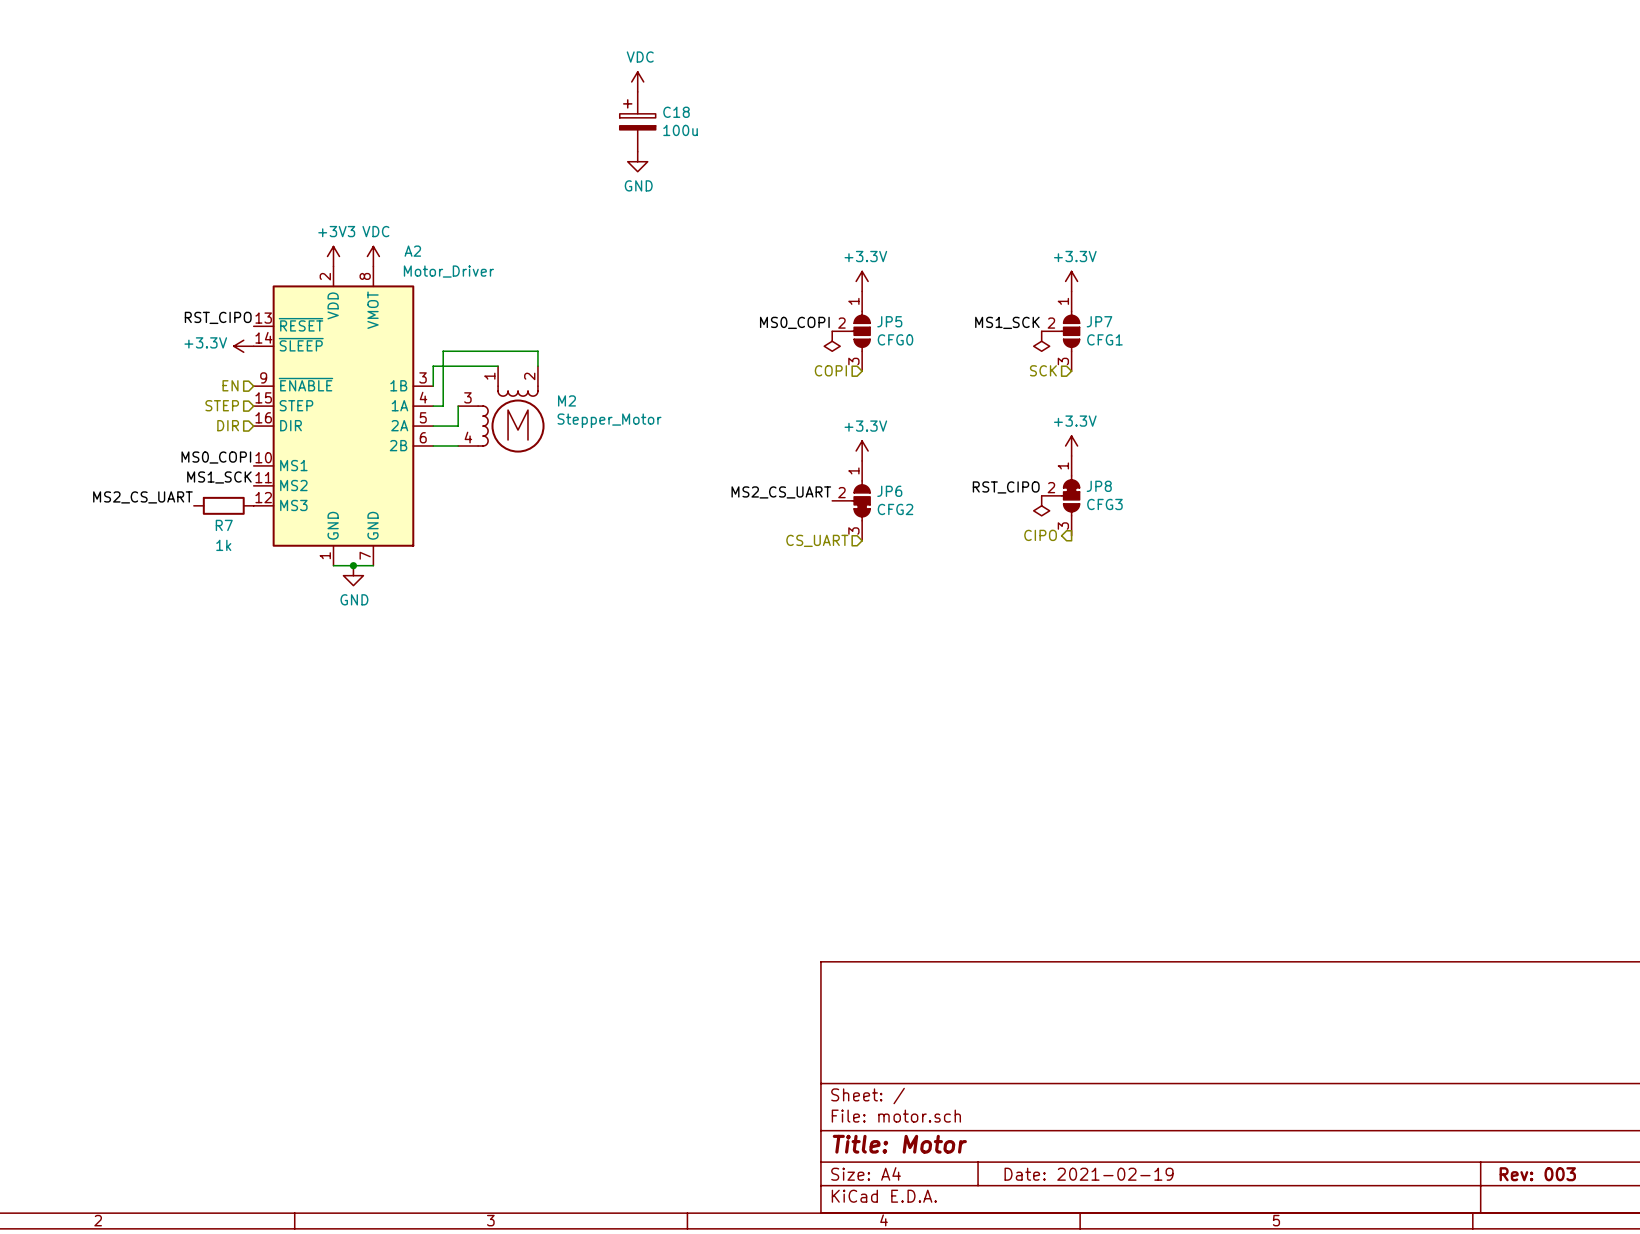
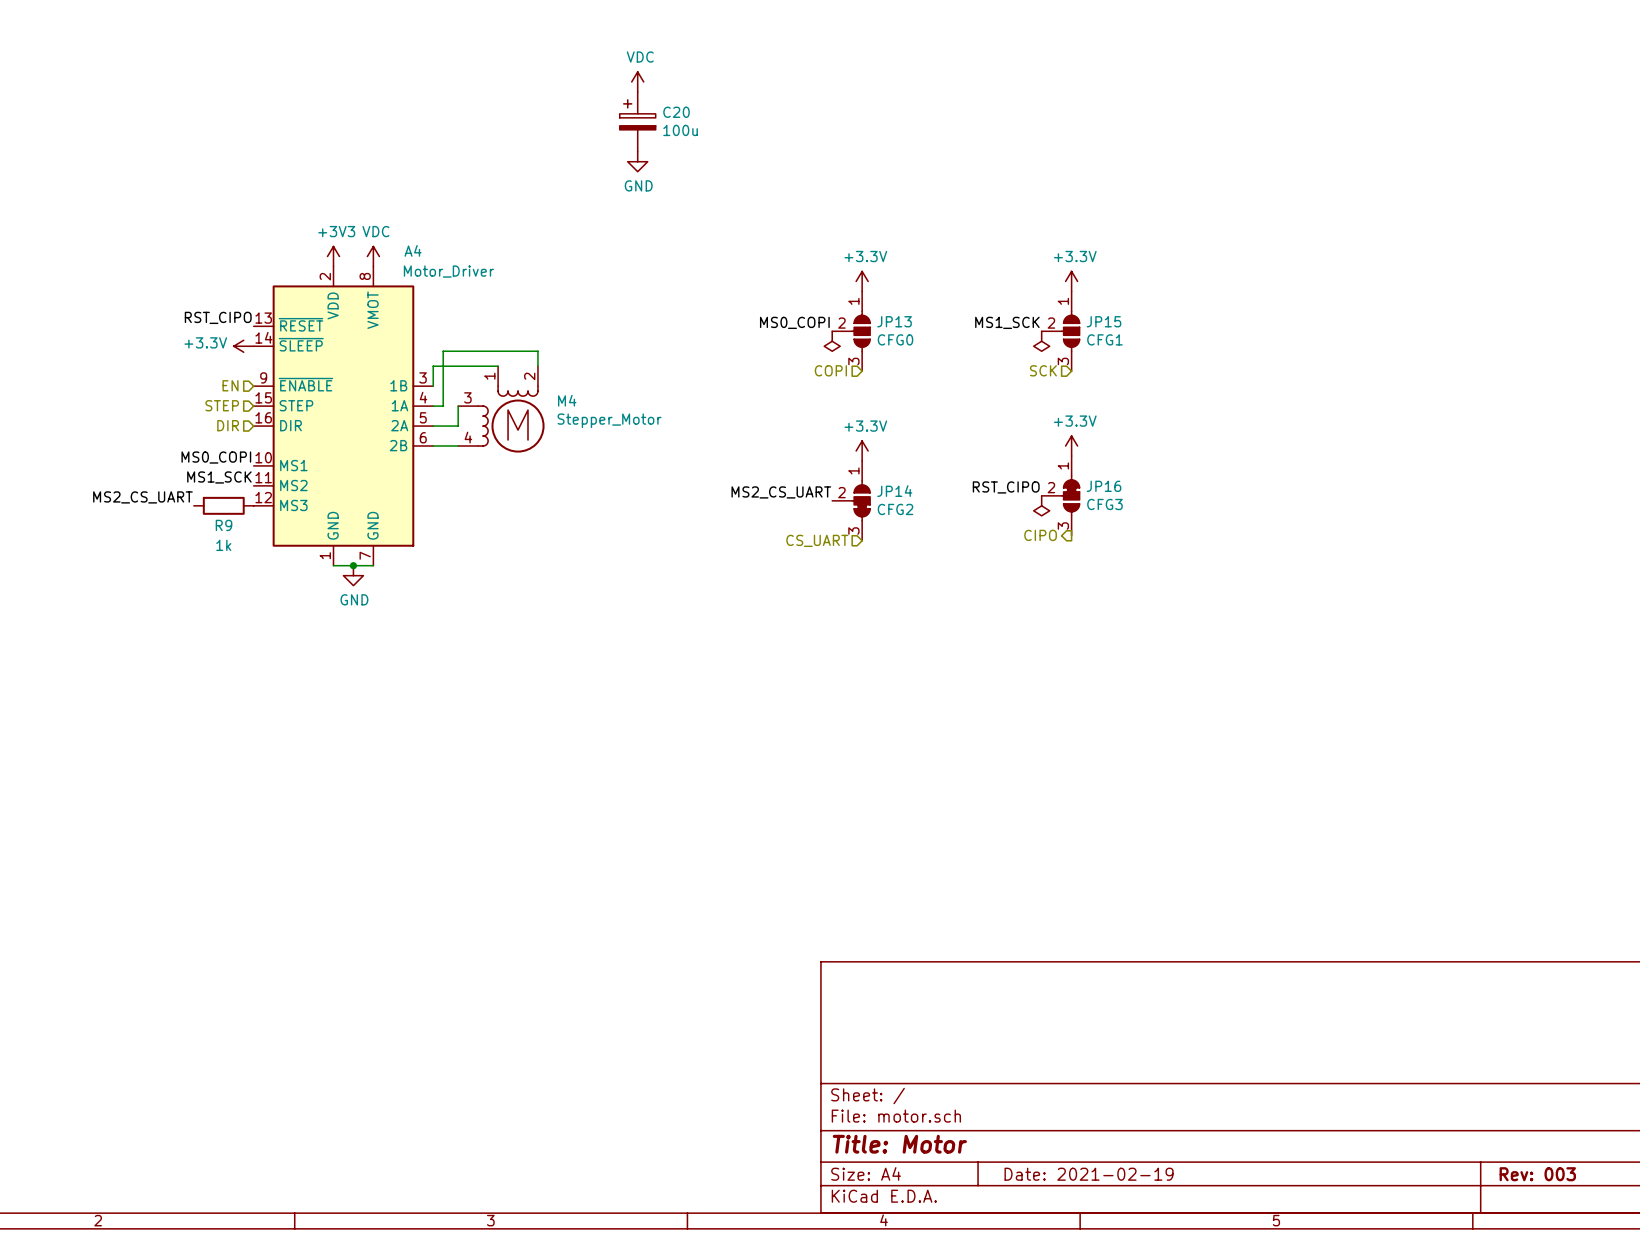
C18 name: C18 (676, 112) -> C20 (676, 112)
A2 name: A2 (412, 251) -> A4 (413, 250)
JP5 name: JP5 (889, 321) -> JP13 (894, 321)
JP7 name: JP7 (1099, 321) -> JP15 (1104, 321)
M2 name: M2 (566, 400) -> M4 (567, 400)
JP8 name: JP8 (1099, 486) -> JP16 (1104, 486)
JP6 name: JP6 (889, 491) -> JP14 (894, 491)
R7 name: R7 (224, 525) -> R9 (224, 525)

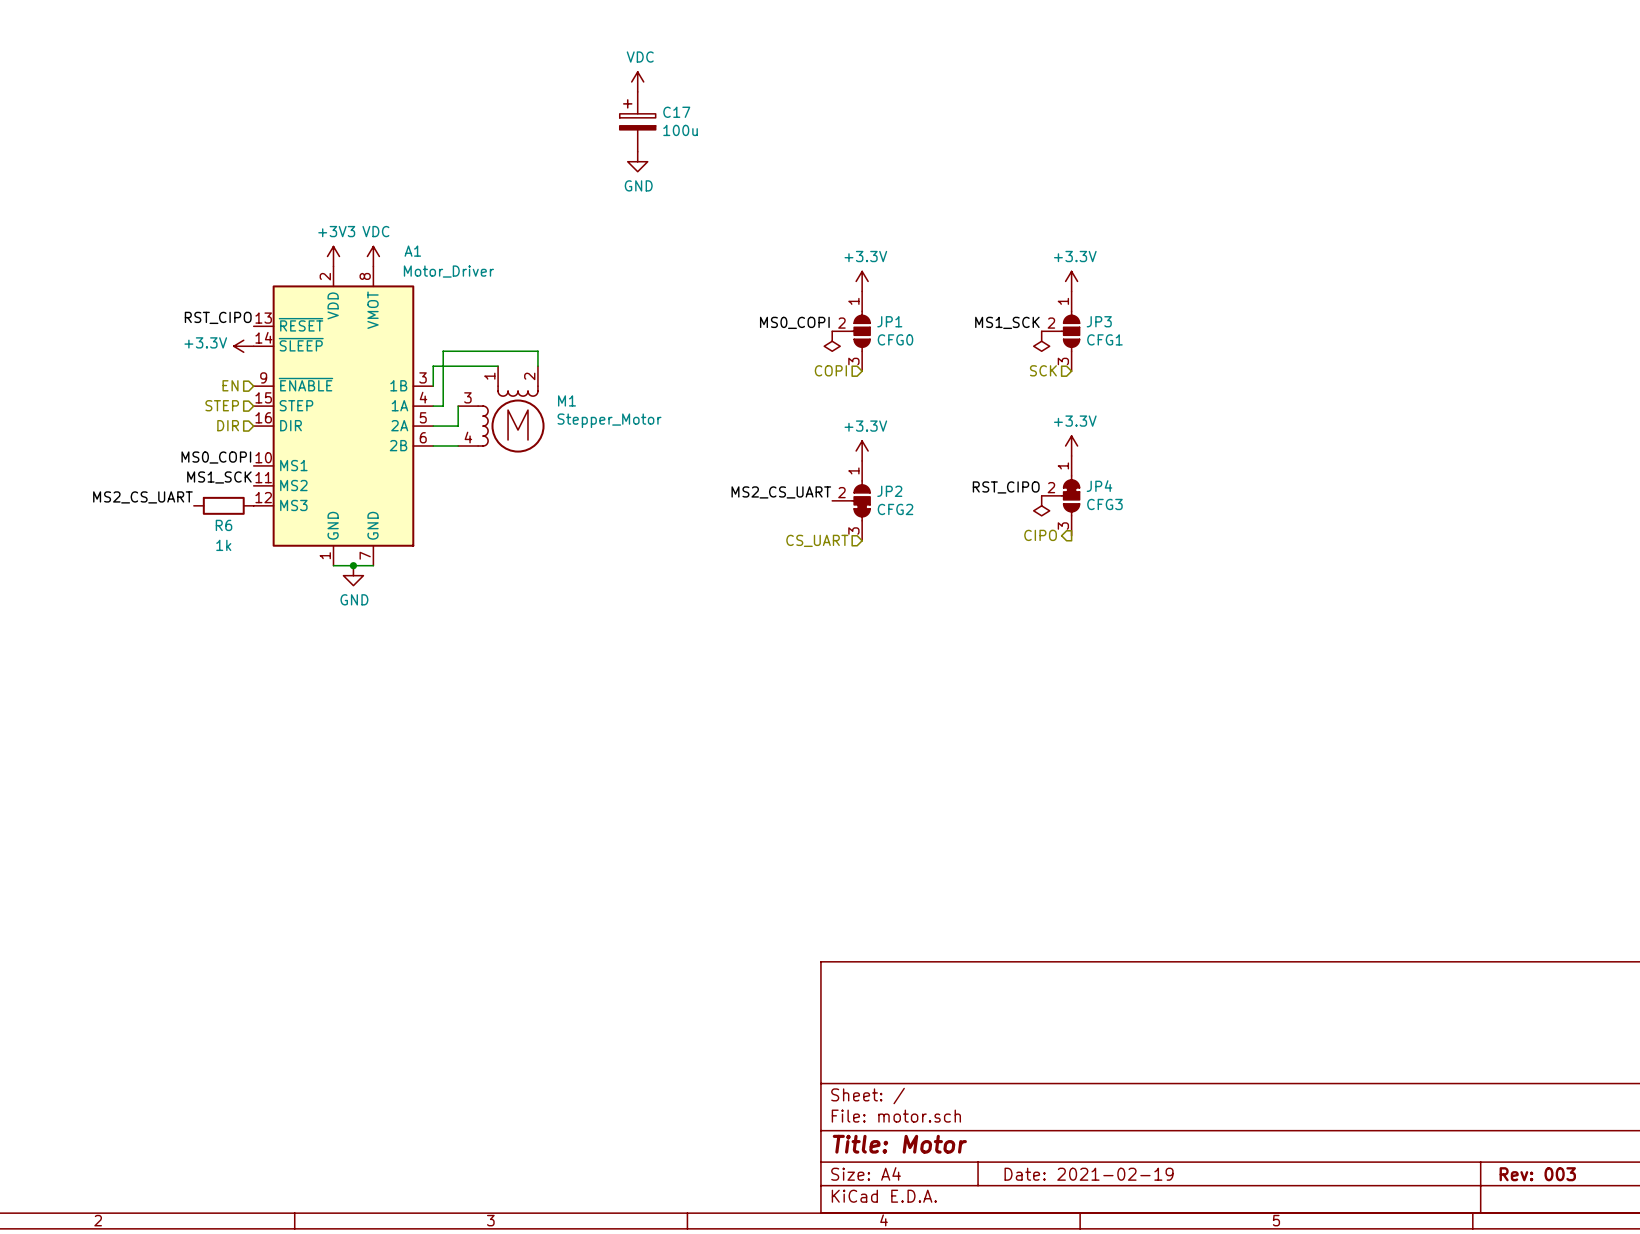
C20 name: C20 (676, 112) -> C17 (676, 112)
A4 name: A4 (413, 250) -> A1 (412, 251)
JP13 name: JP13 (894, 321) -> JP1 (889, 321)
JP15 name: JP15 (1104, 321) -> JP3 (1099, 321)
M4 name: M4 (567, 400) -> M1 (566, 400)
JP16 name: JP16 (1104, 486) -> JP4 (1099, 486)
JP14 name: JP14 (894, 491) -> JP2 (889, 491)
R9 name: R9 (224, 525) -> R6 (224, 525)

